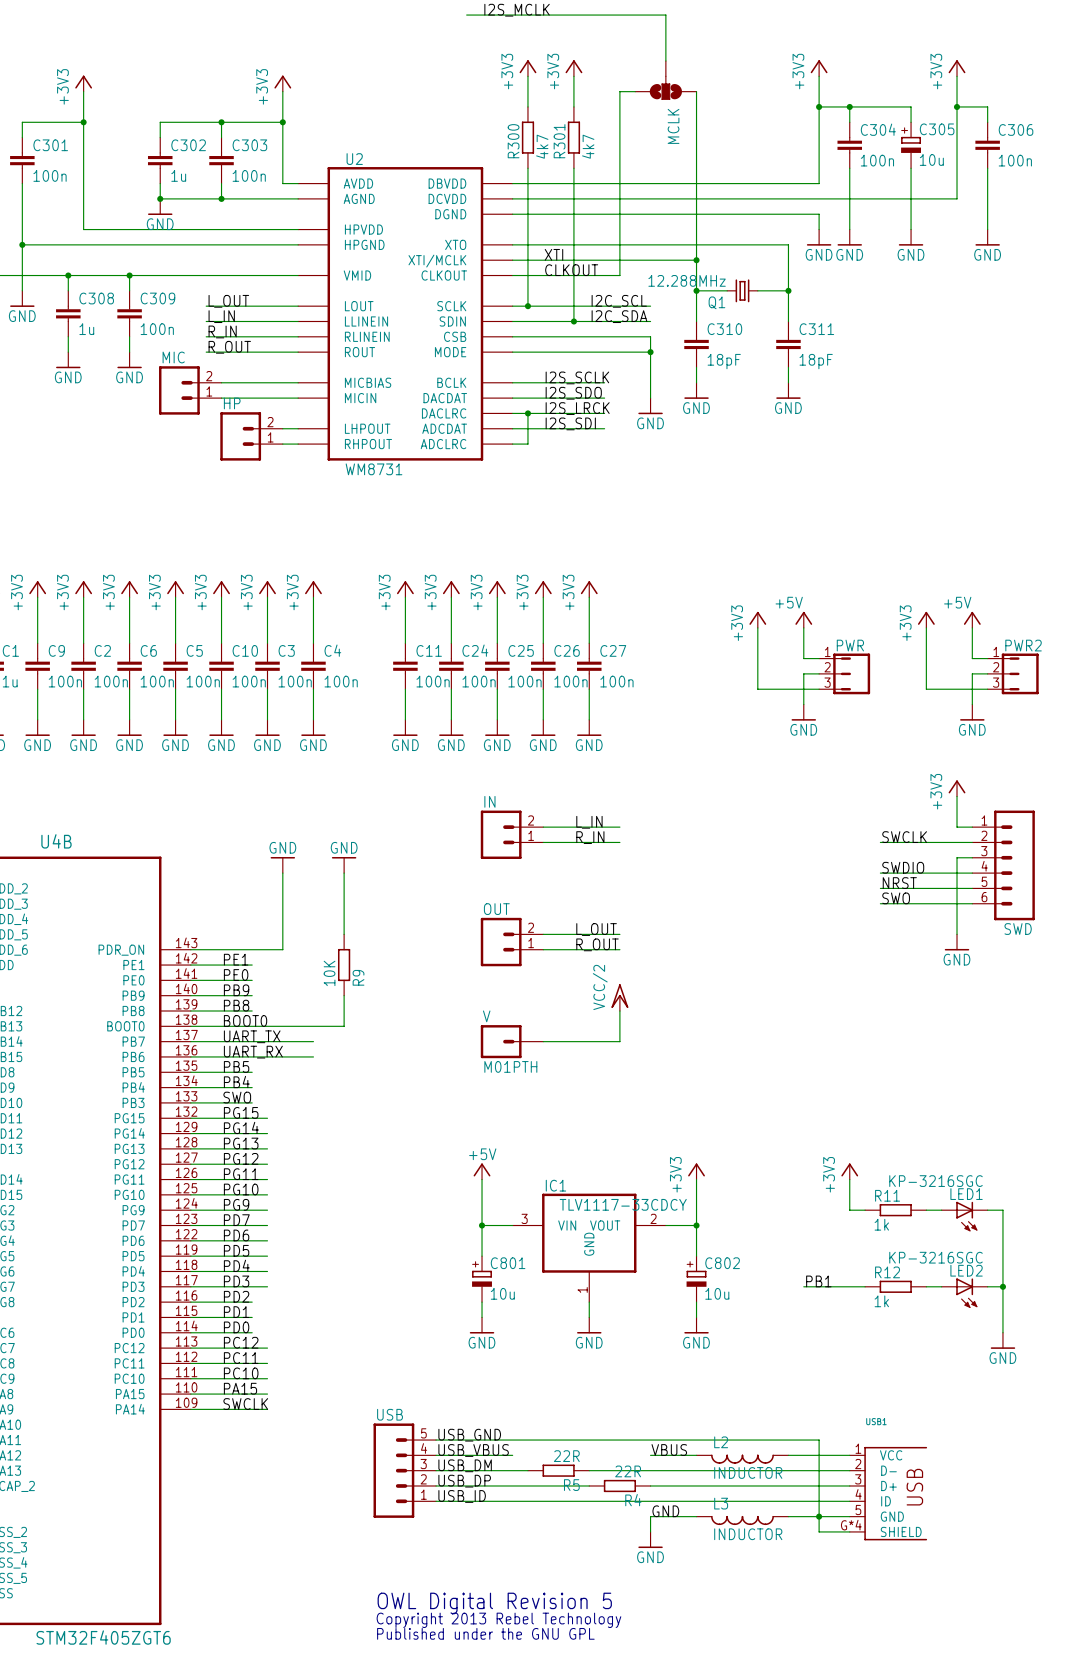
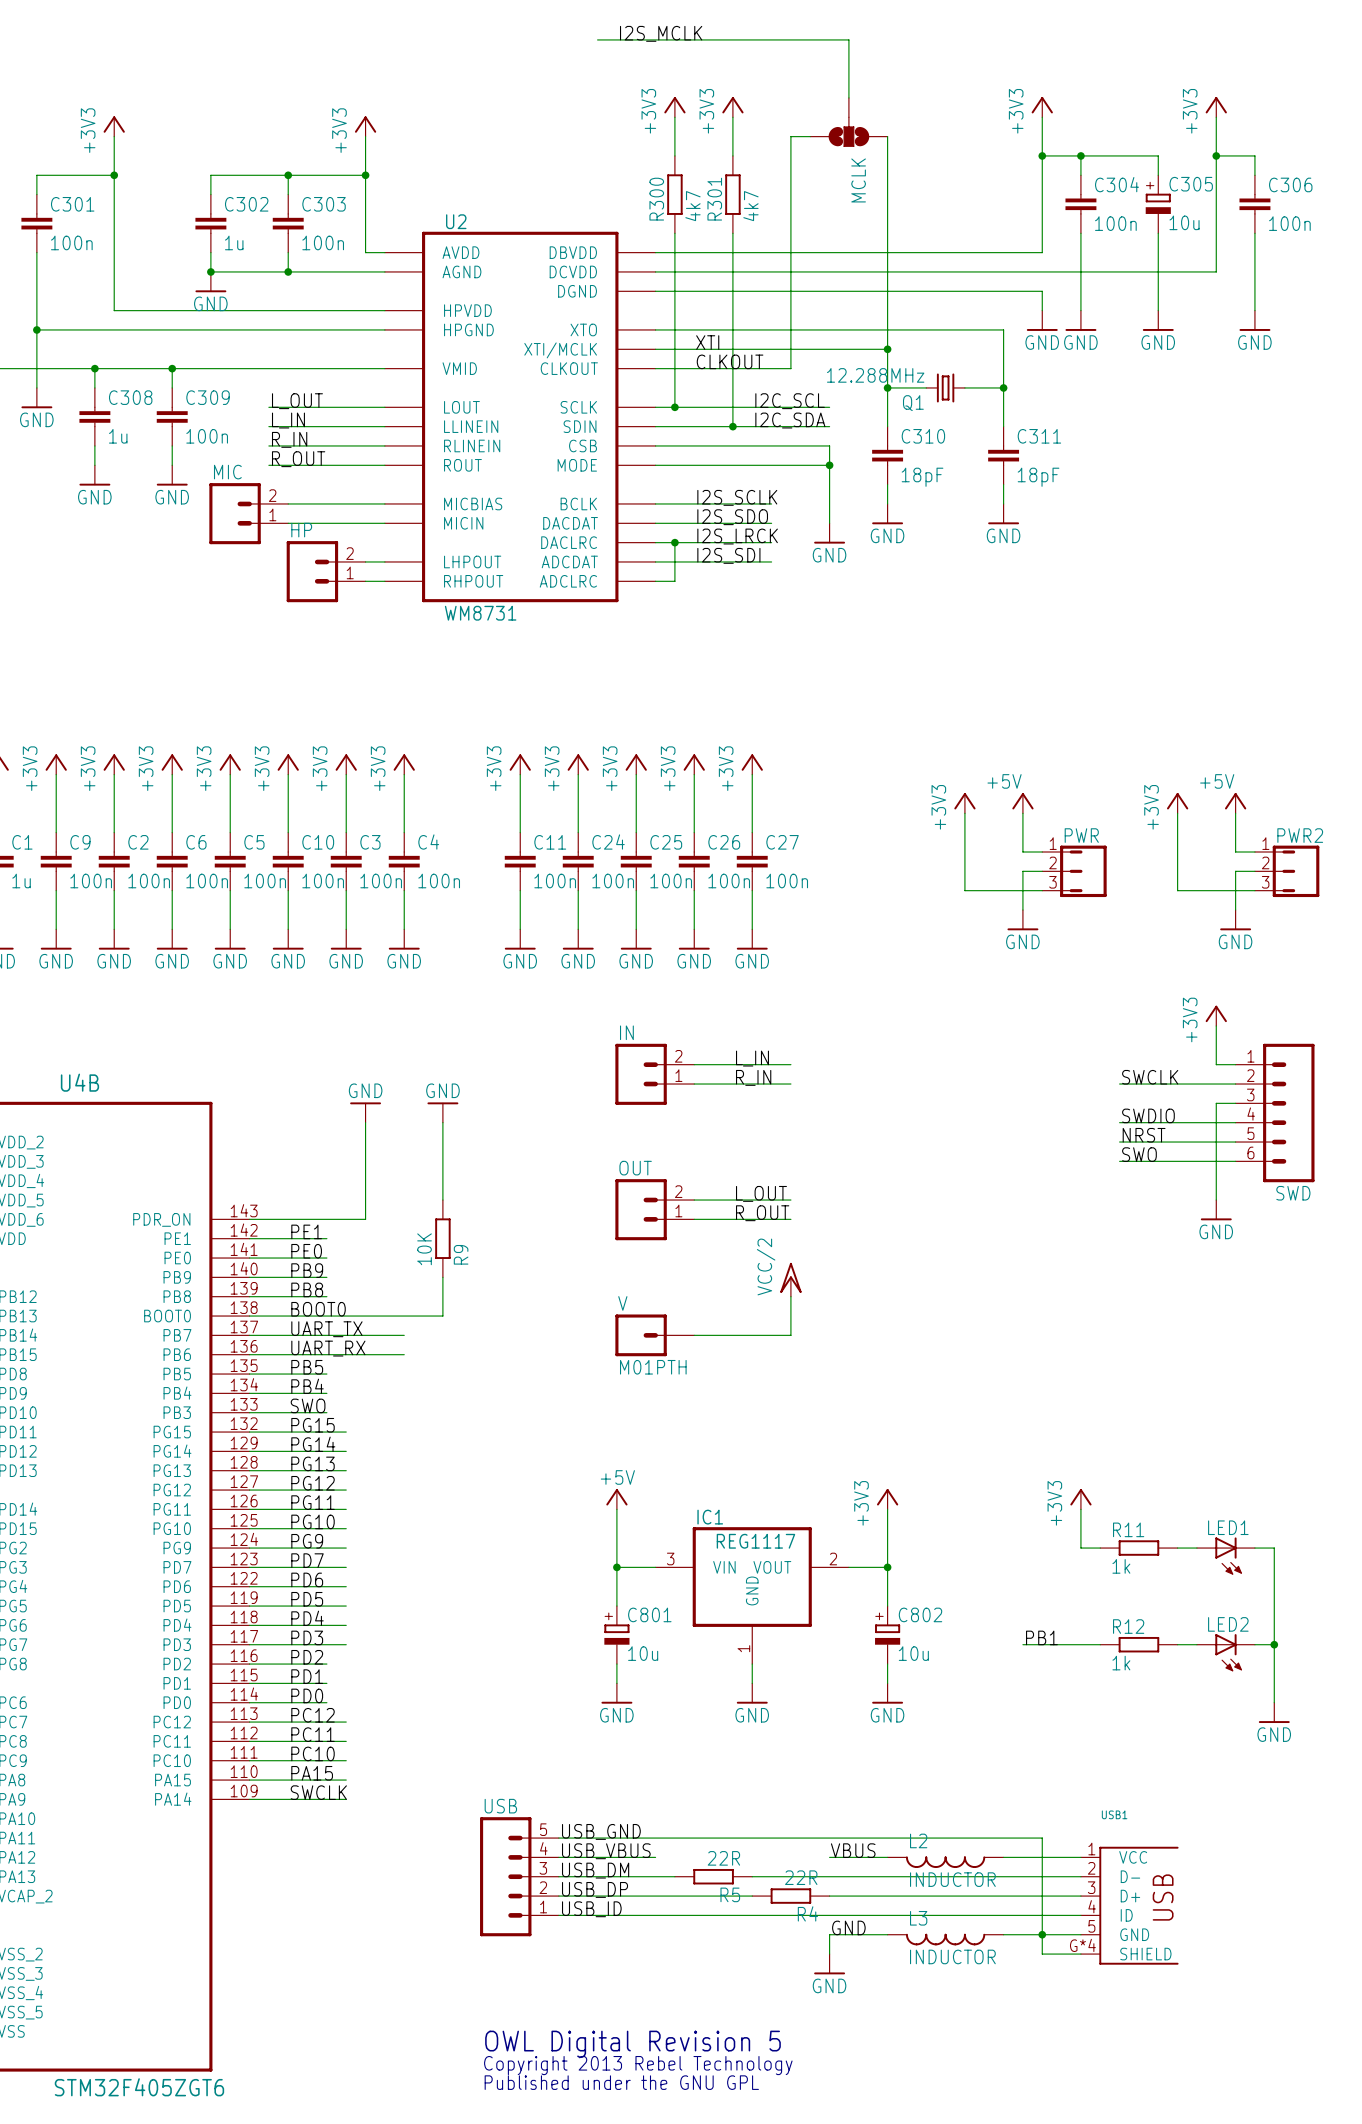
LED1 value: KP-3216SGC (935, 1181) -> none
IC1 value: TLV1117-33CDCY (623, 1204) -> REG1117 (755, 1541)
LED2 value: KP-3216SGC (935, 1257) -> none

